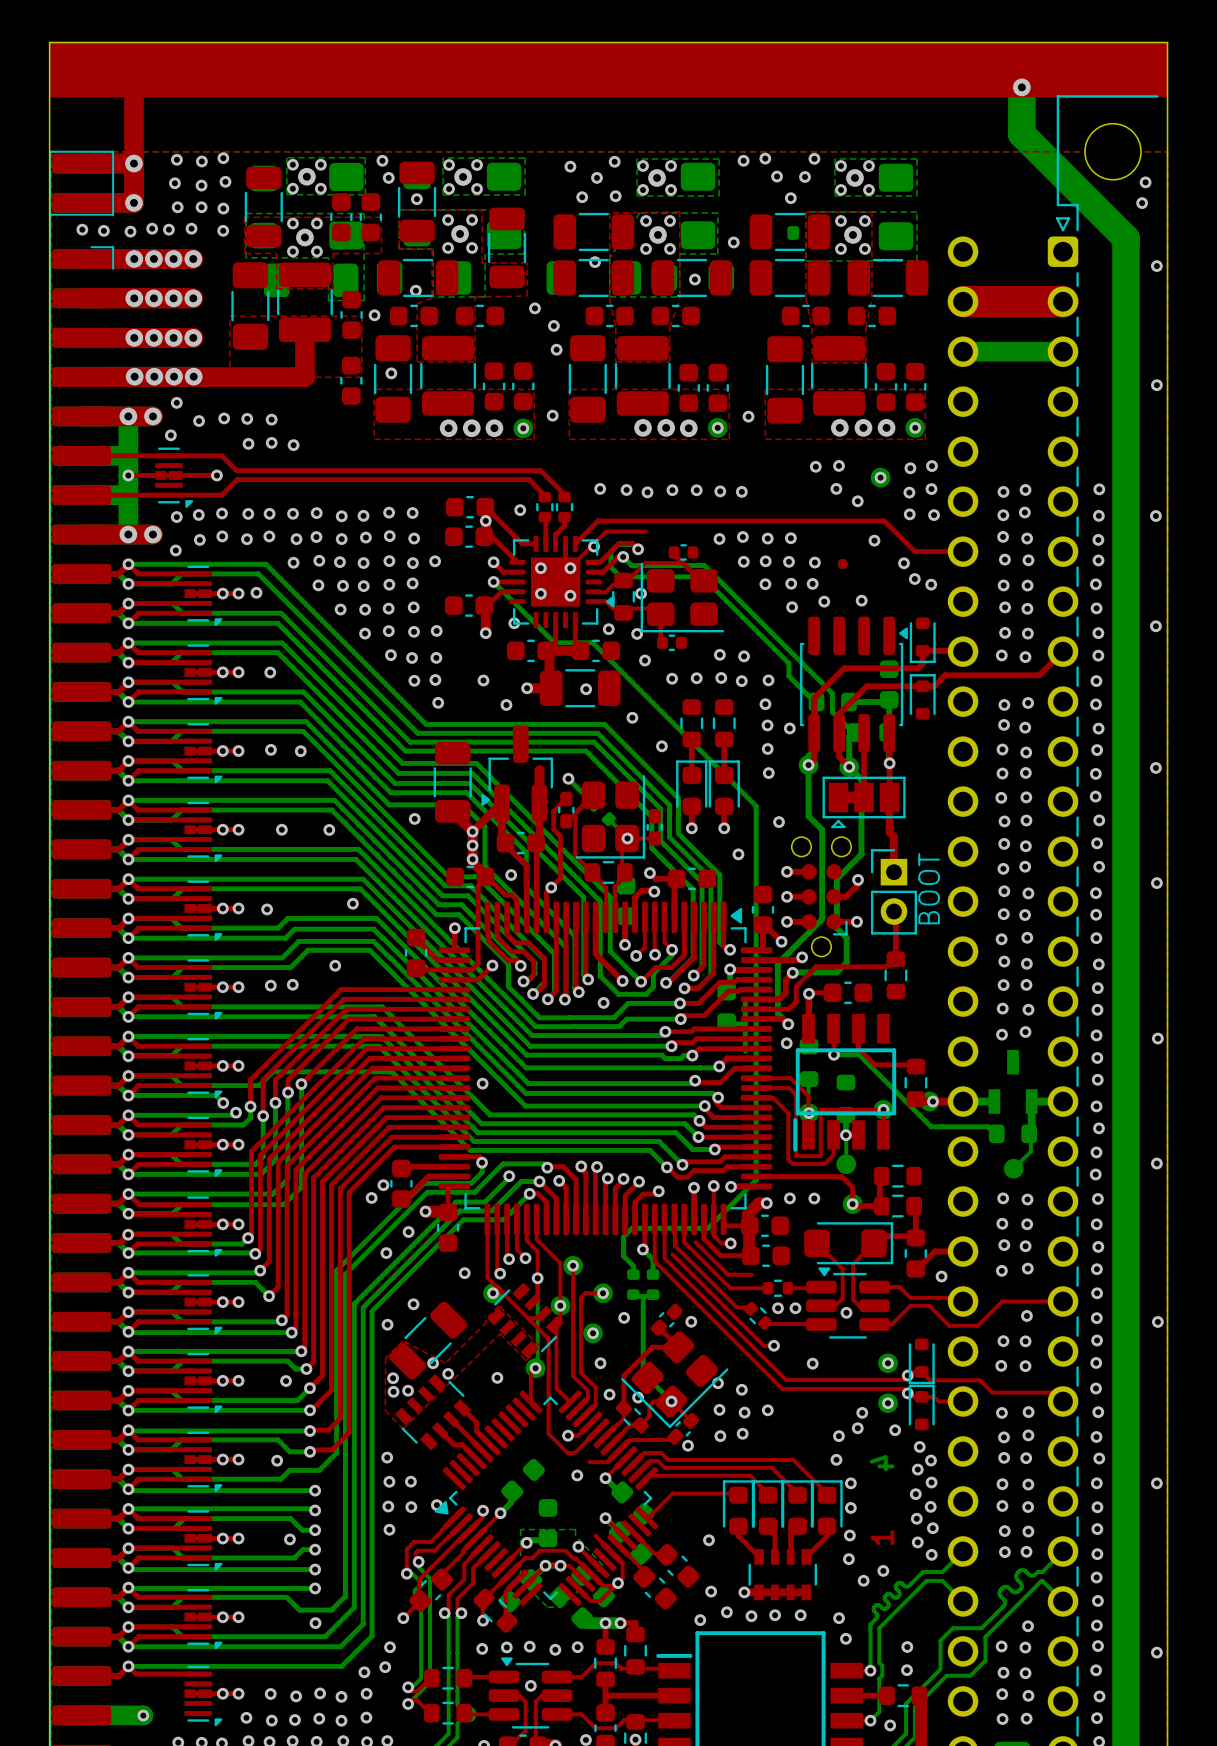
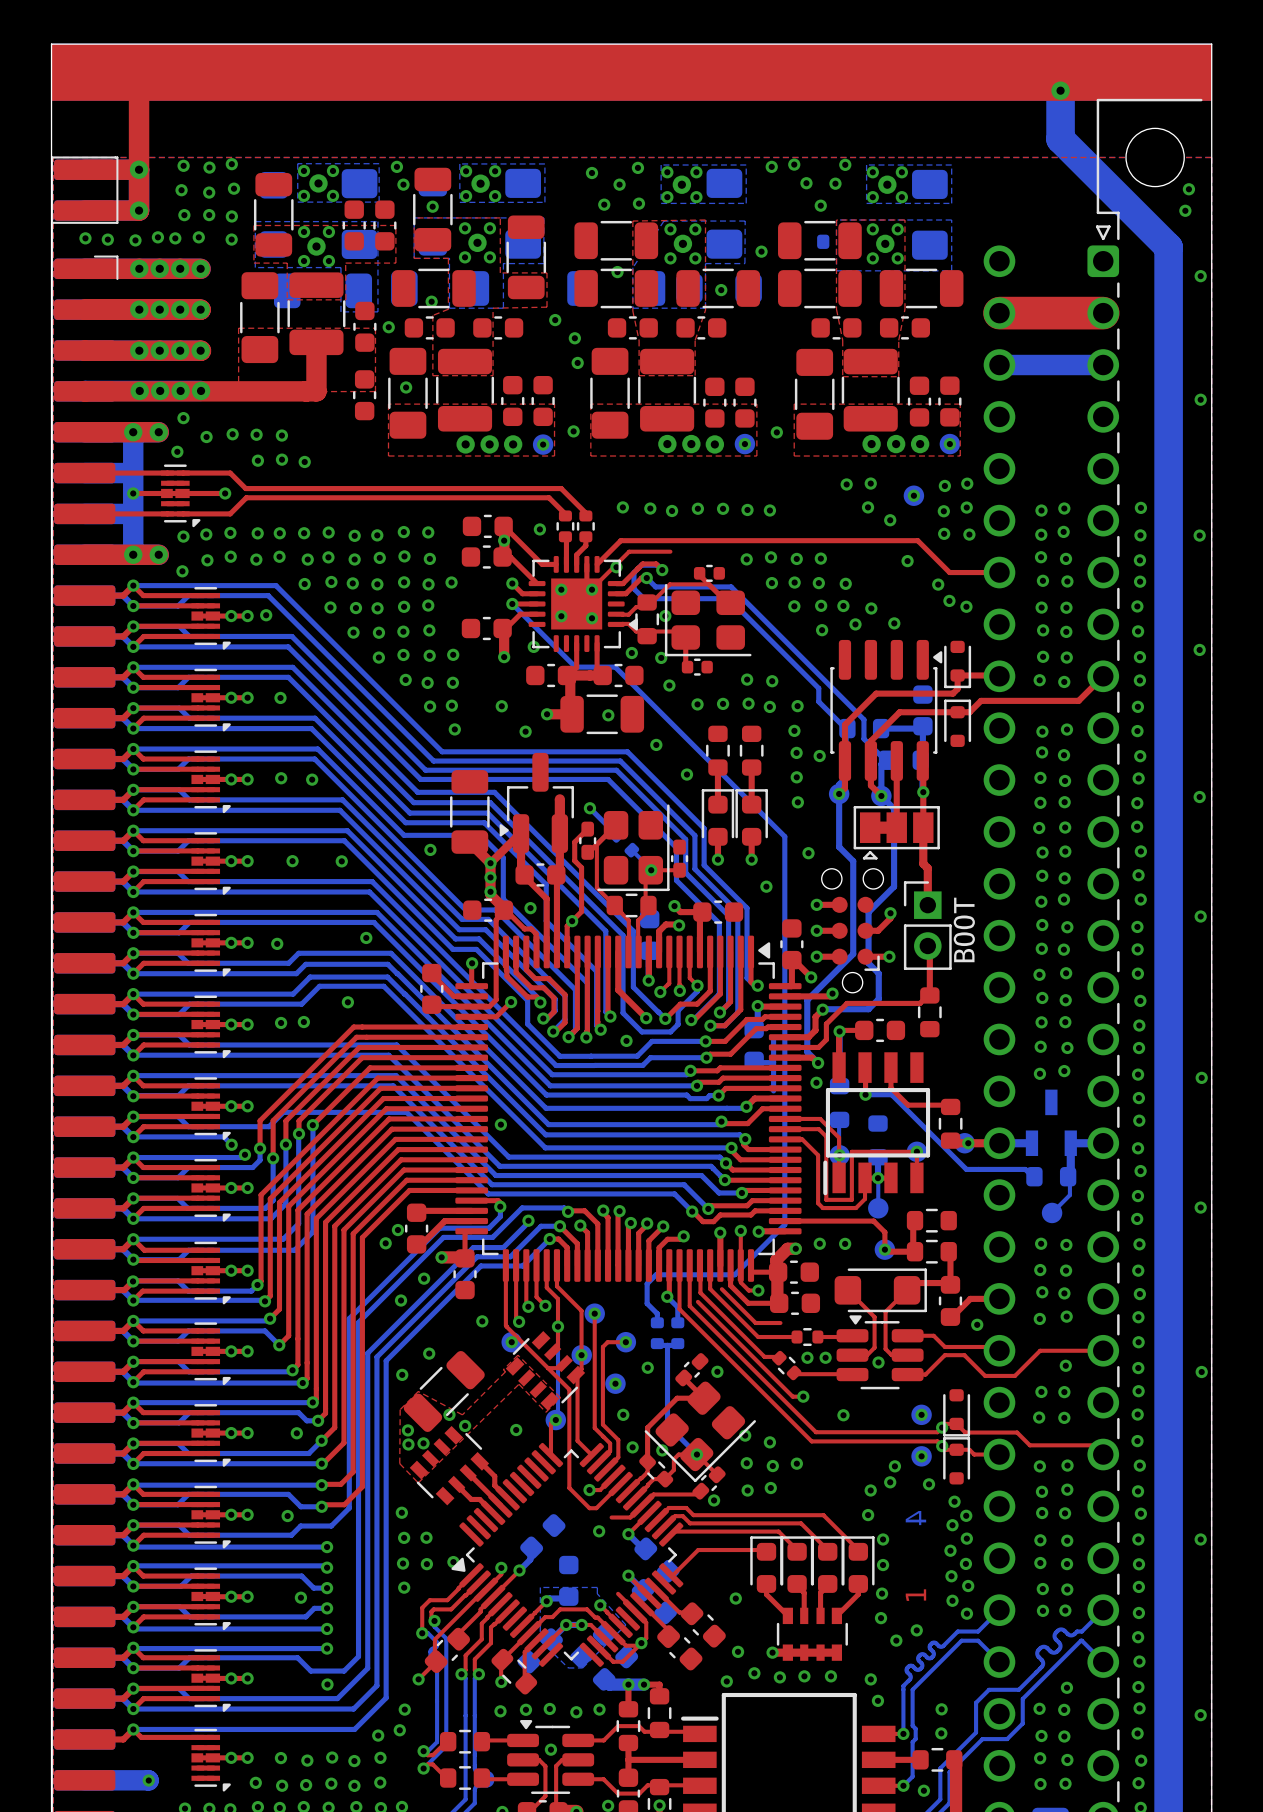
part: (842, 564) -> none
via: none -> (871, 608)

